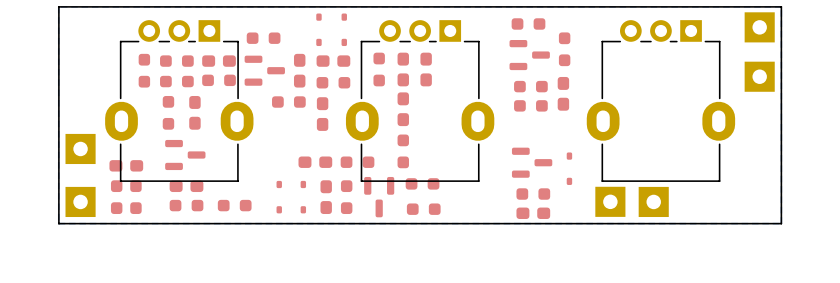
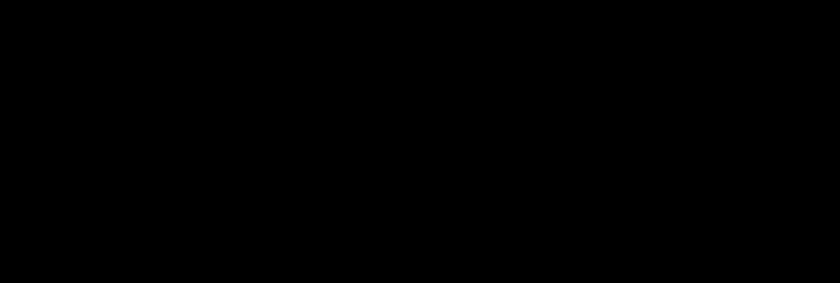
board edge: (781, 6) (58, 6) (58, 223) (781, 223) (781, 6) -> none
part: (528, 23) -> none
part: (759, 27) -> none
part: (318, 29) -> none
part: (344, 29) -> none
part: (263, 38) -> none
part: (564, 49) -> none
part: (529, 55) -> none
part: (176, 61) -> none
part: (219, 61) -> none
part: (333, 61) -> none
part: (379, 69) -> none
part: (403, 69) -> none
part: (426, 69) -> none
part: (144, 70) -> none
part: (264, 70) -> none
part: (299, 70) -> none
part: (759, 76) -> none
part: (219, 80) -> none
part: (176, 81) -> none
part: (333, 82) -> none
part: (530, 86) -> none
part: (563, 93) -> none
part: (179, 100) -> none
part: (420, 100) -> none
part: (660, 100) -> none
part: (288, 102) -> none
part: (530, 105) -> none
part: (403, 109) -> none
part: (168, 112) -> none
part: (194, 112) -> none
part: (322, 114) -> none
part: (80, 148) -> none
part: (403, 151) -> none
part: (185, 154) -> none
part: (315, 162) -> none
part: (357, 162) -> none
part: (532, 162) -> none
part: (126, 165) -> none
part: (569, 168) -> none
part: (422, 183) -> none
part: (186, 186) -> none
part: (533, 194) -> none
part: (116, 197) -> none
part: (135, 197) -> none
part: (279, 197) -> none
part: (303, 197) -> none
part: (326, 197) -> none
part: (346, 197) -> none
part: (379, 197) -> none
part: (80, 201) -> none
part: (610, 201) -> none
part: (653, 201) -> none
part: (186, 205) -> none
part: (234, 205) -> none
part: (423, 209) -> none
part: (533, 213) -> none

